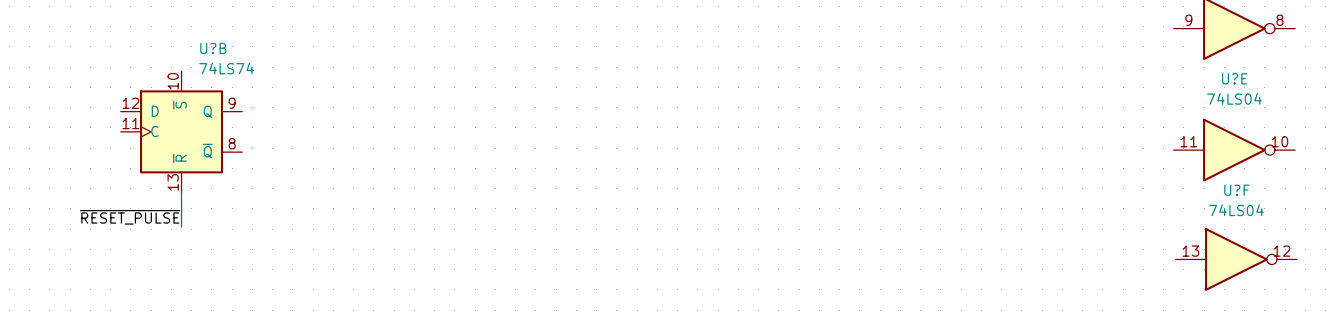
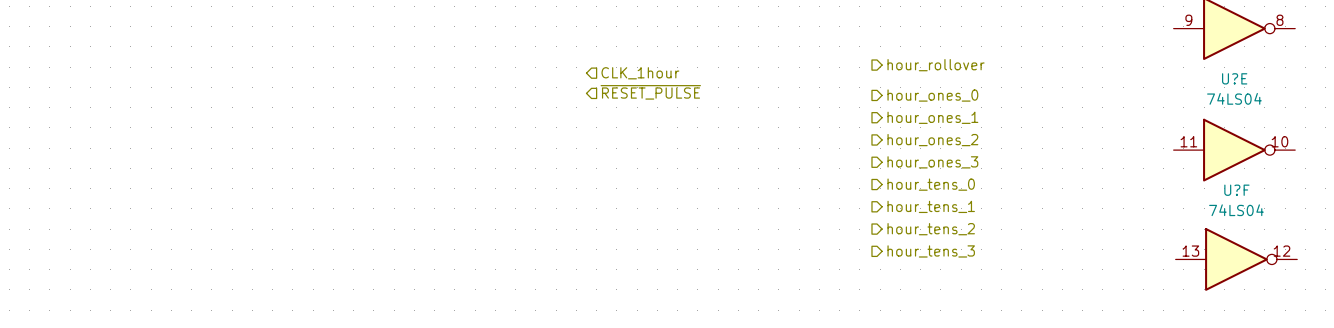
hierarchical label: none -> hour_rollover (936, 65)
hierarchical label: none -> CLK_1hour (640, 73)
hierarchical label: none -> ~{RESET_PULSE} (650, 92)
hierarchical label: none -> hour_ones_0 (932, 95)
hierarchical label: none -> hour_ones_1 (932, 117)
U?B: 74LS74 (181, 131) -> none
hierarchical label: none -> hour_ones_2 (932, 140)
hierarchical label: none -> hour_ones_3 (932, 162)
hierarchical label: none -> hour_tens_0 (931, 184)
wire: (181, 192) (181, 227) -> none
hierarchical label: none -> hour_tens_1 (931, 206)
label: ~{RESET_PULSE} (130, 217) -> none
hierarchical label: none -> hour_tens_2 (931, 229)
hierarchical label: none -> hour_tens_3 (931, 251)

